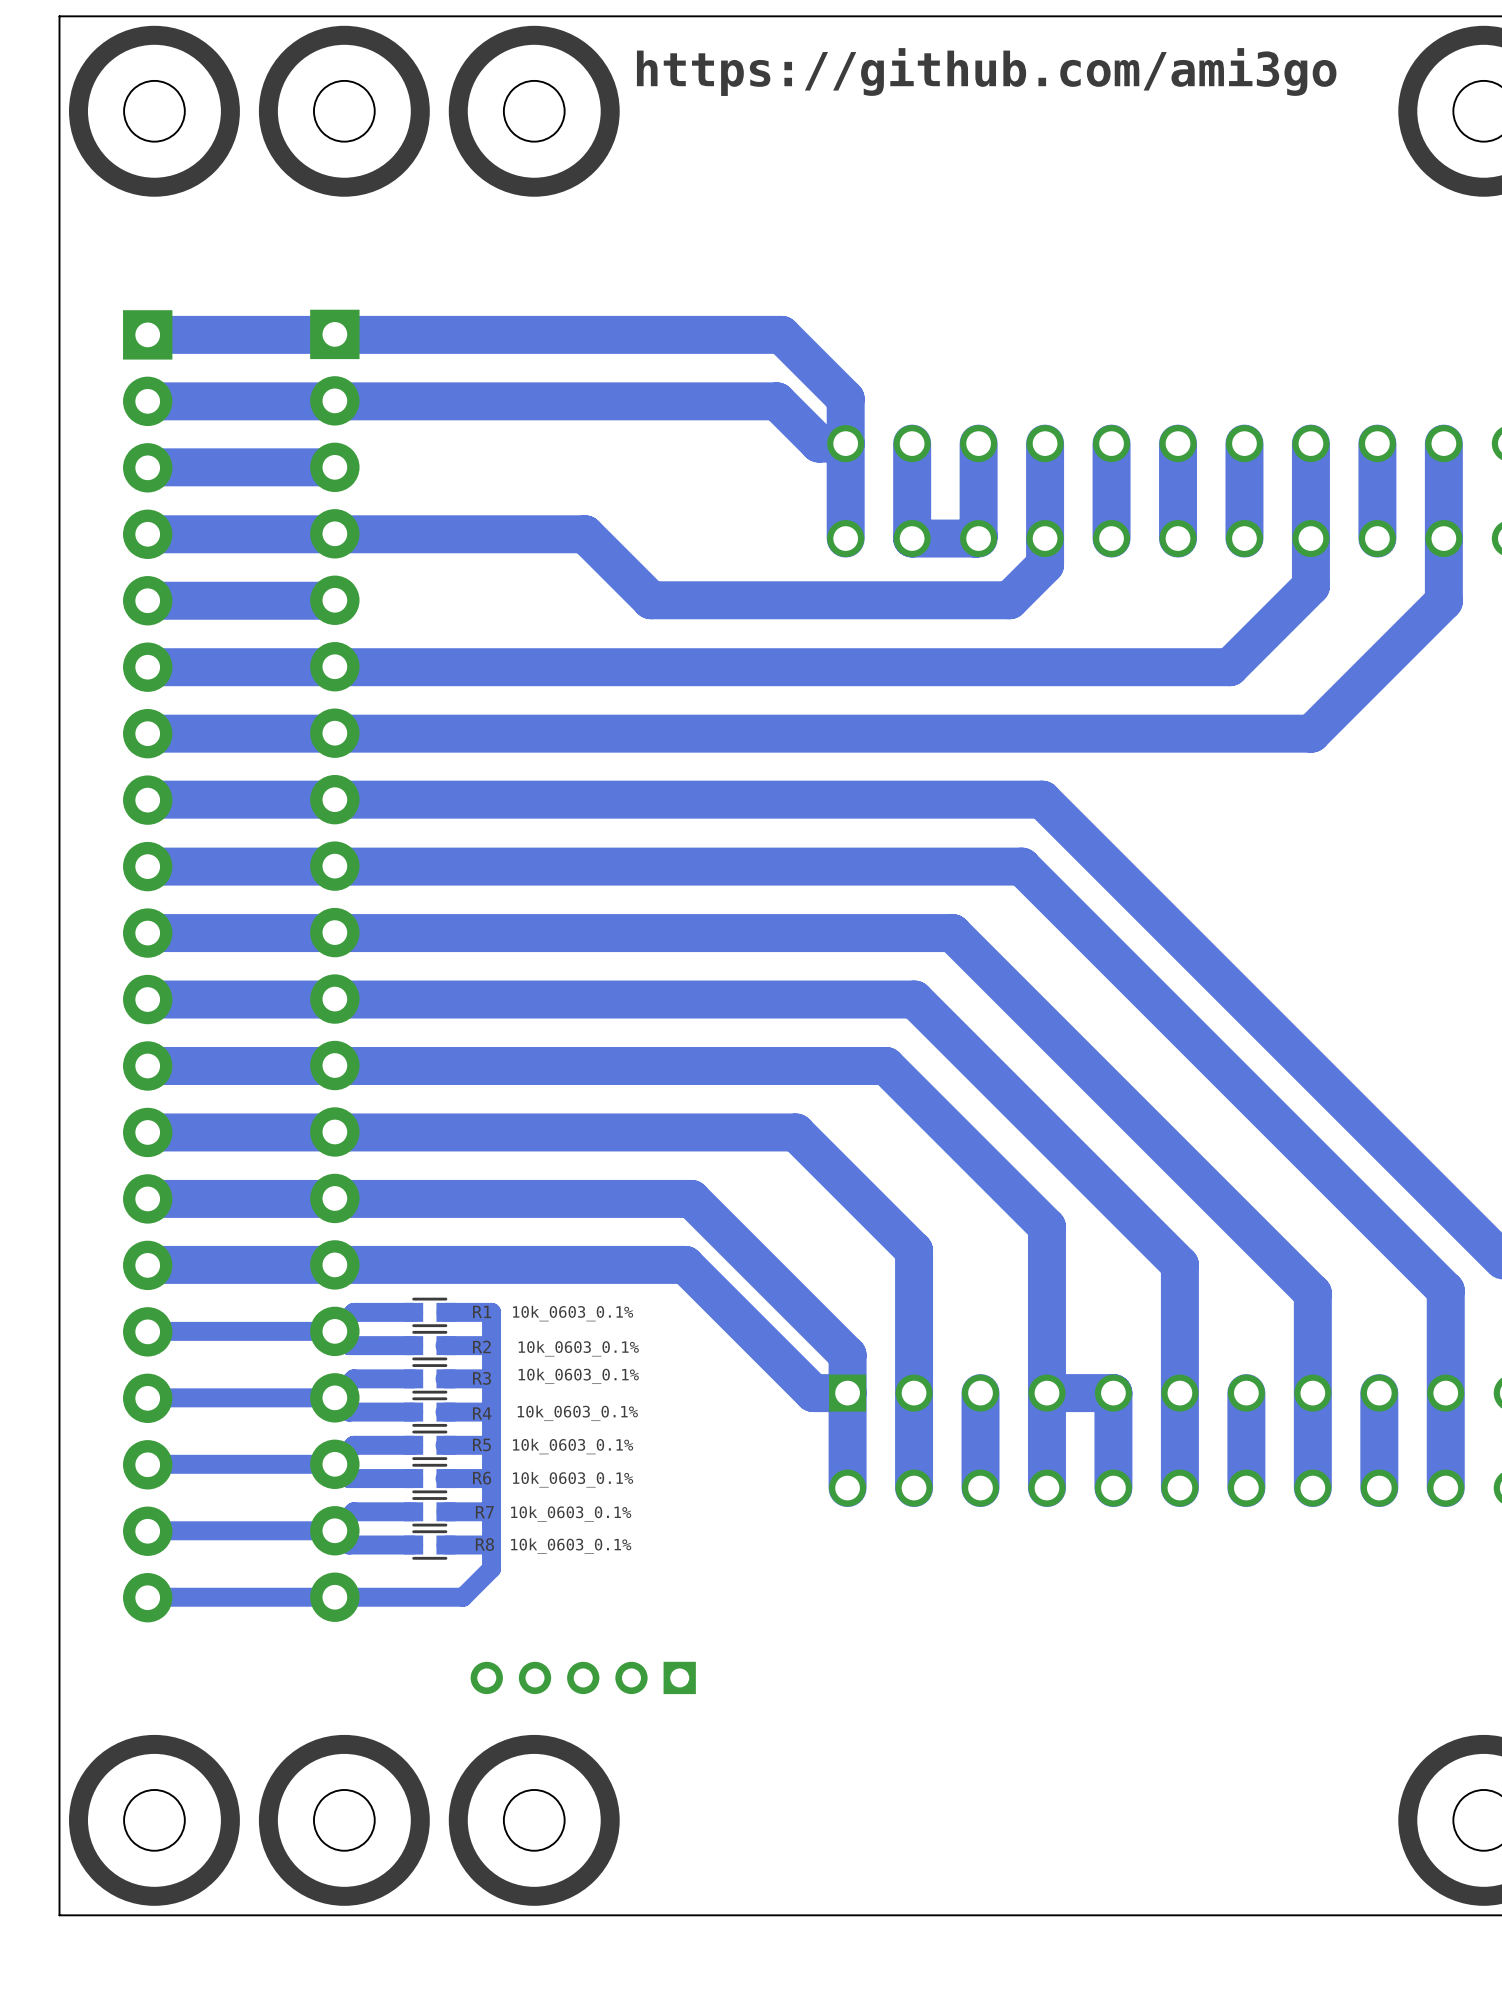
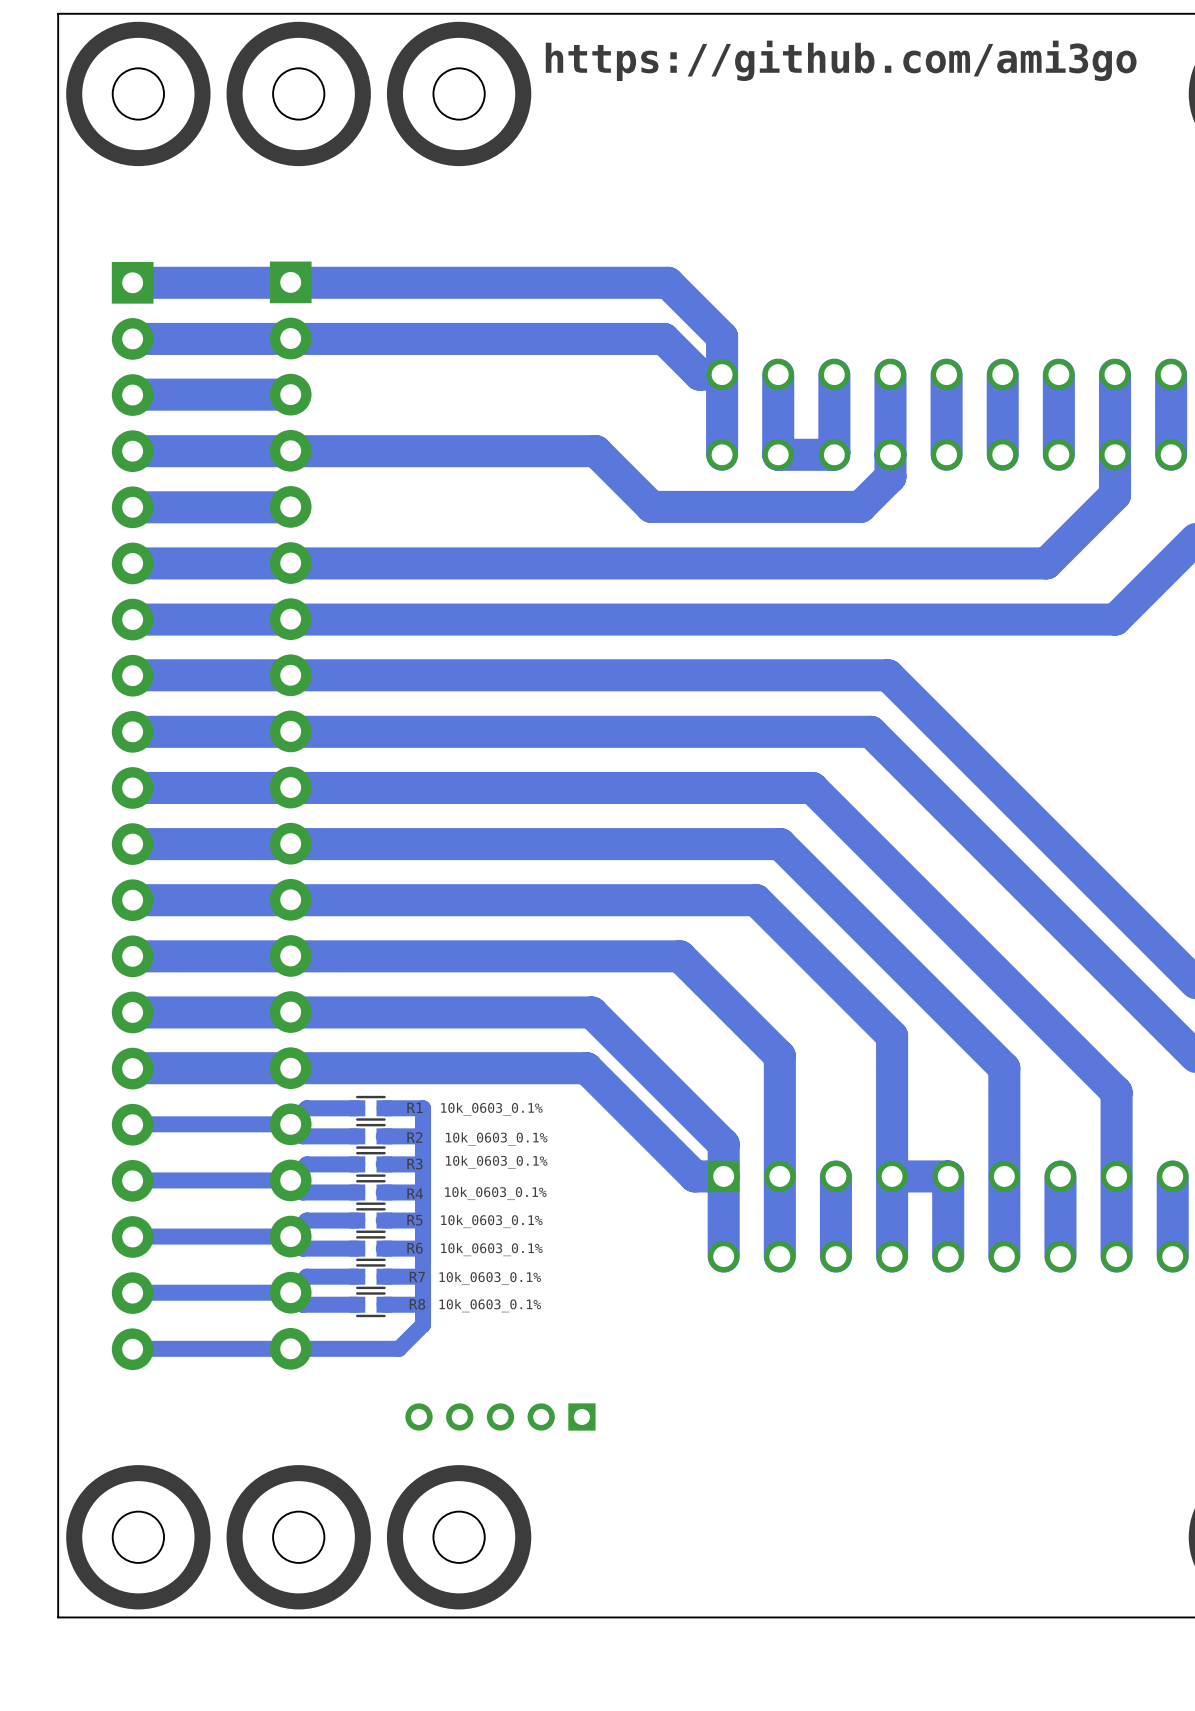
track: (585, 534) (651, 600) (762, 600) -> (501, 451) (595, 451) (651, 506)

